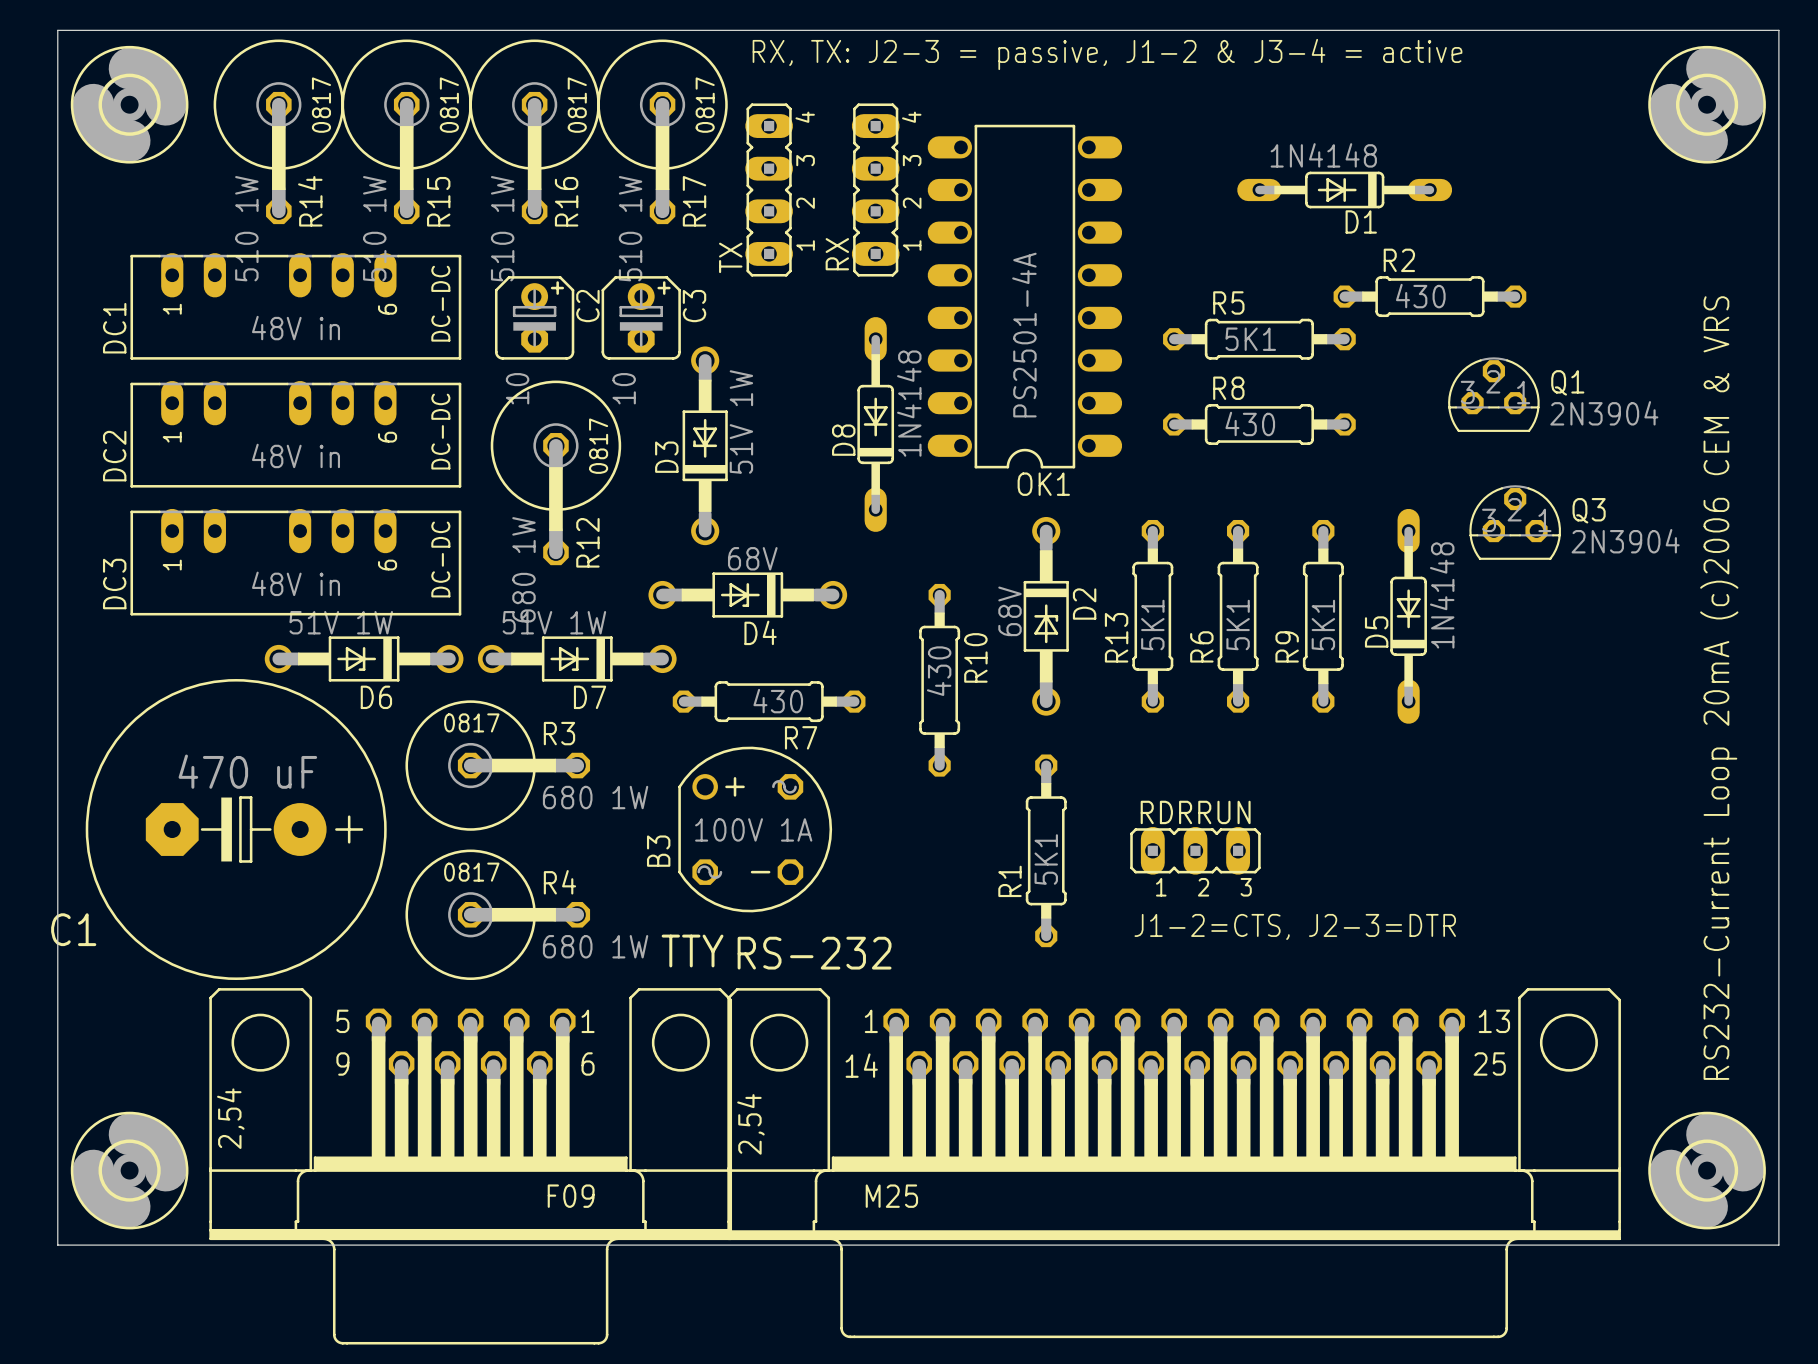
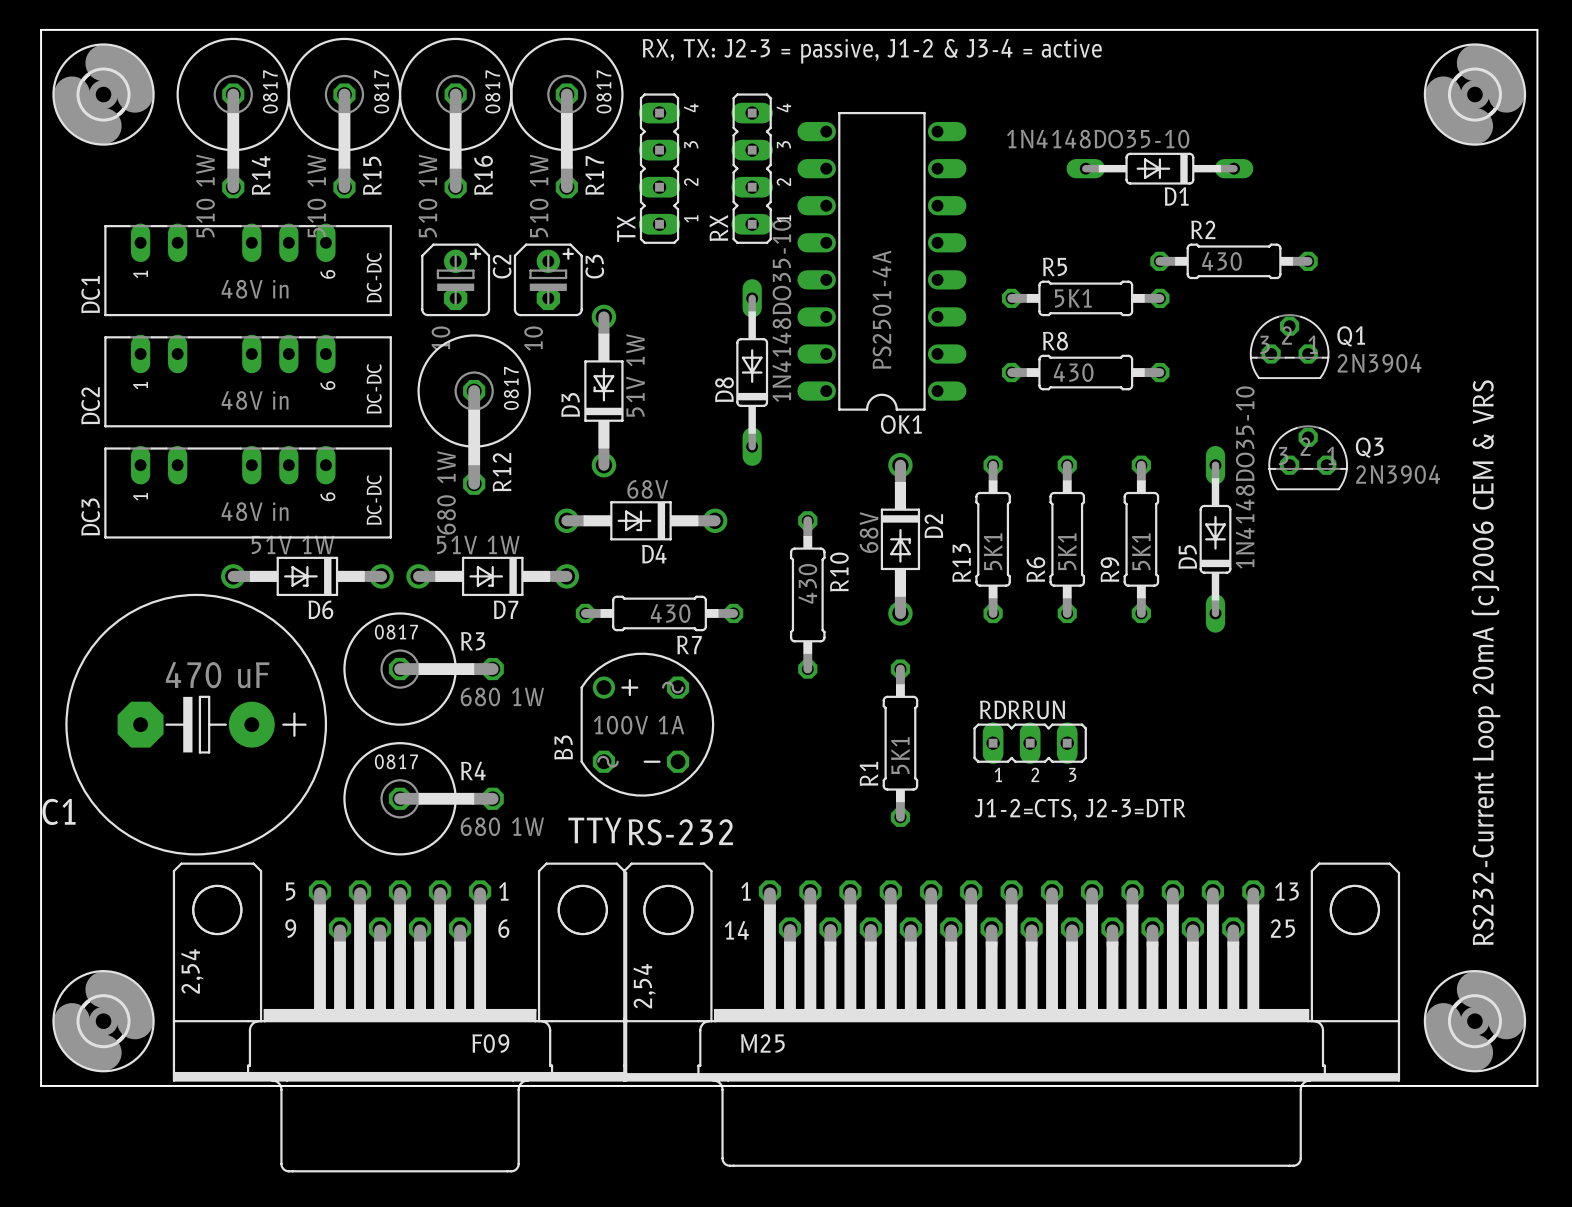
D1 value: 1N4148 (1323, 155) -> 1N4148DO35-10 (1098, 139)
D8 value: 1N4148 (909, 403) -> 1N4148DO35-10 (781, 310)
D5 value: 1N4148 (1442, 595) -> 1N4148DO35-10 (1245, 477)

